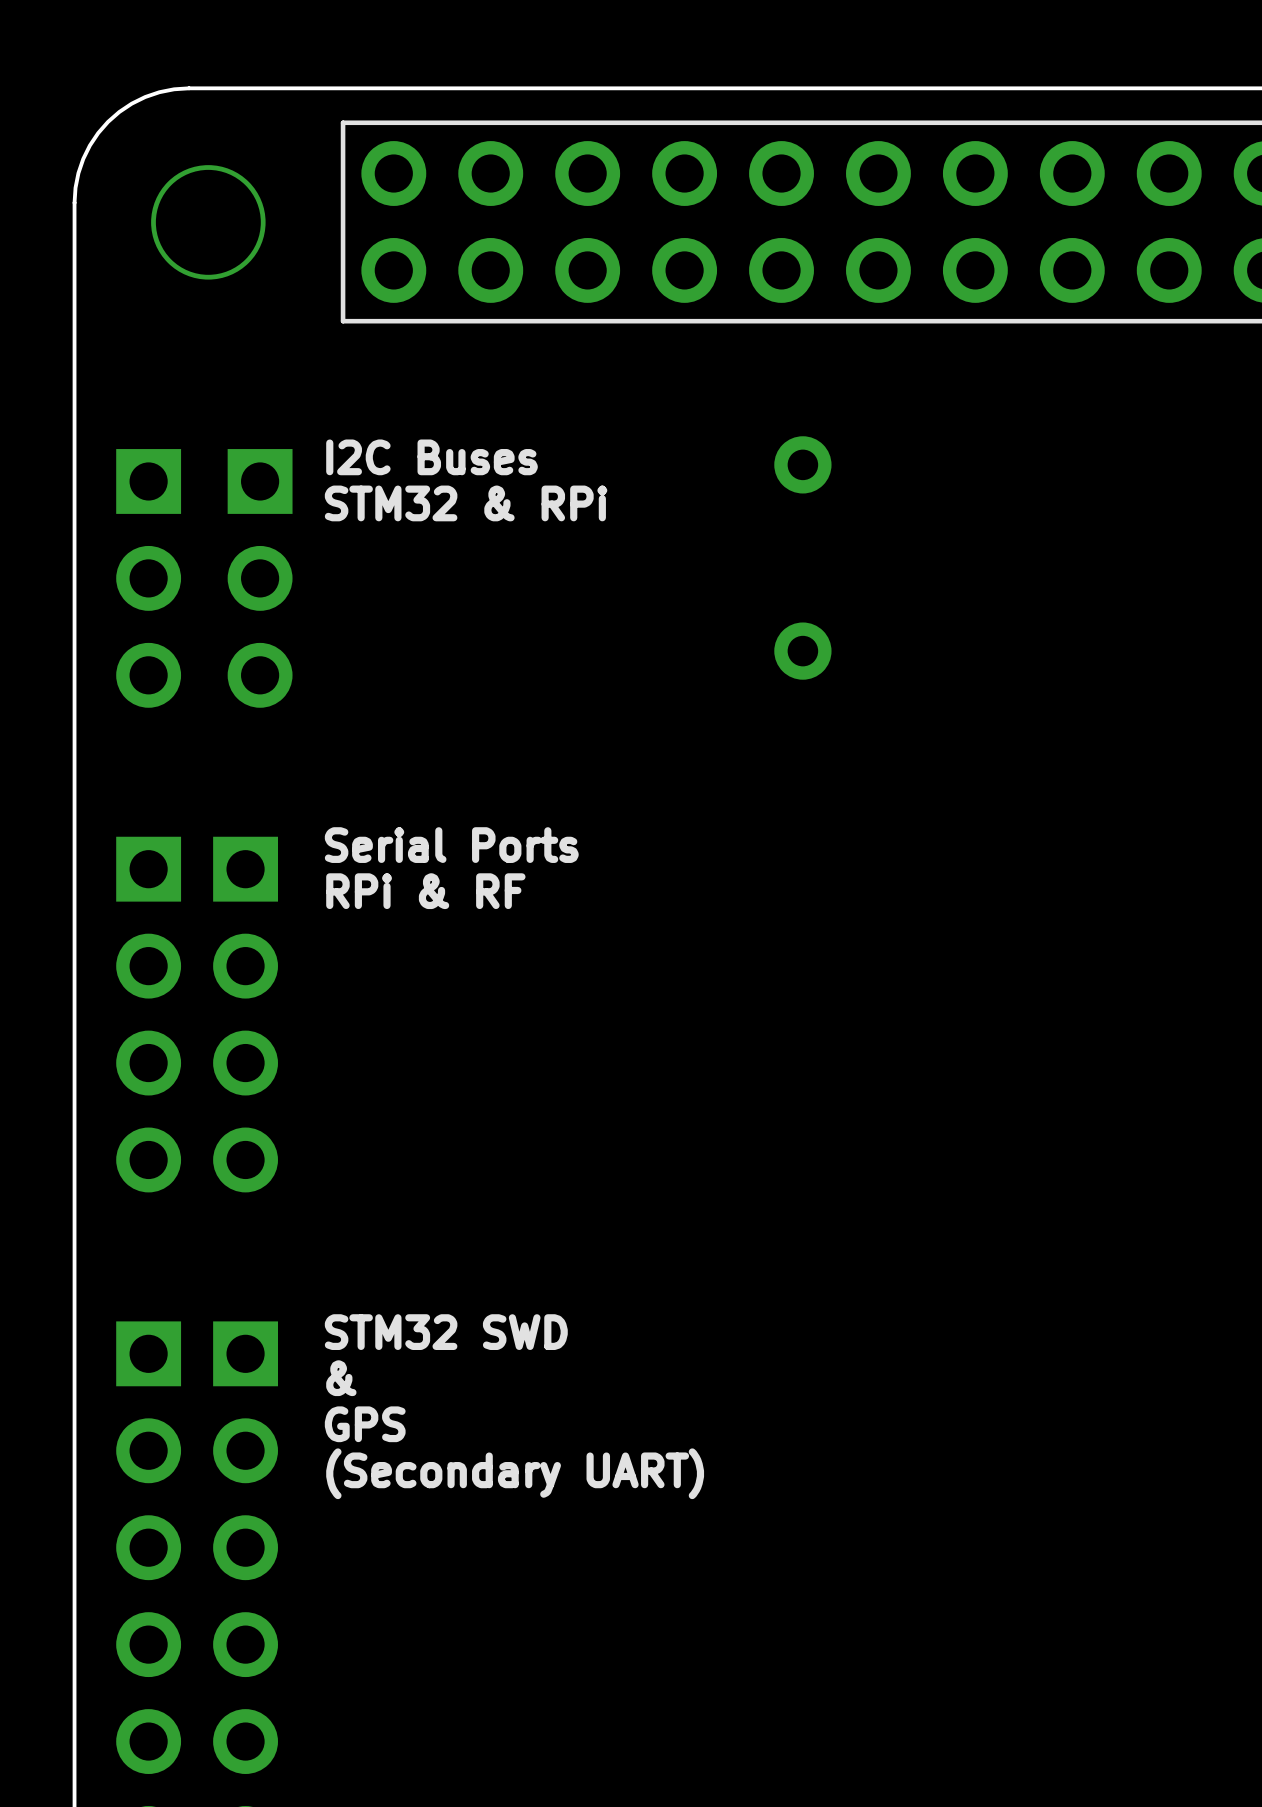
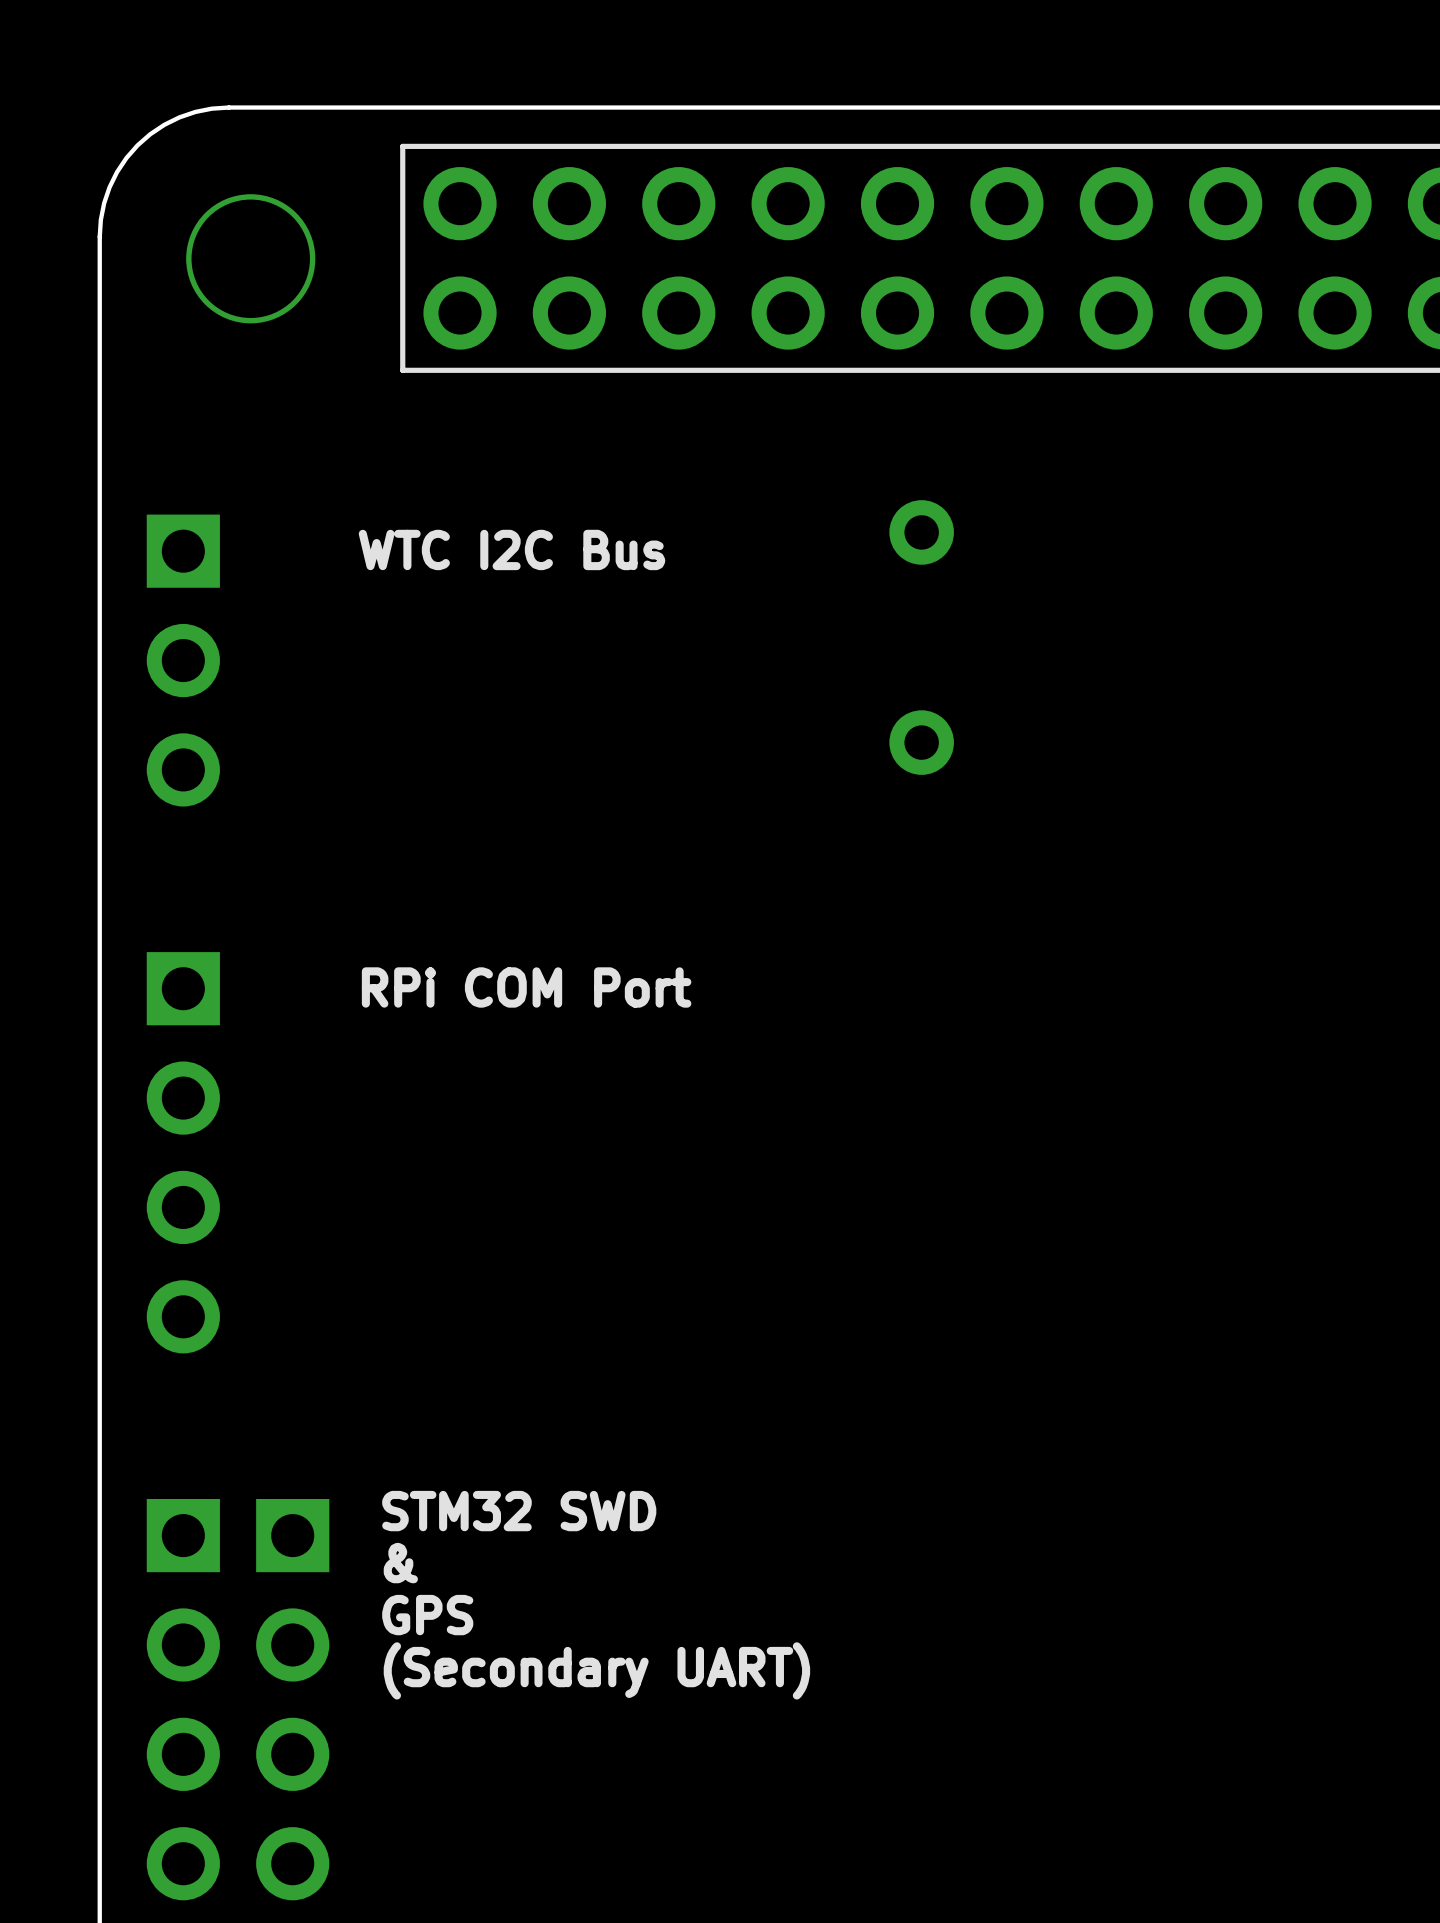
text: I2C Buses (431, 457) -> WTC I2C Bus (511, 549)
text: STM32 & RPi (466, 503) -> none
part: (260, 578) -> none
text: Serial Ports (451, 845) -> none
text: none -> RPi COM Port (526, 987)
text: RPi & RF (425, 891) -> none
part: (245, 1014) -> none

